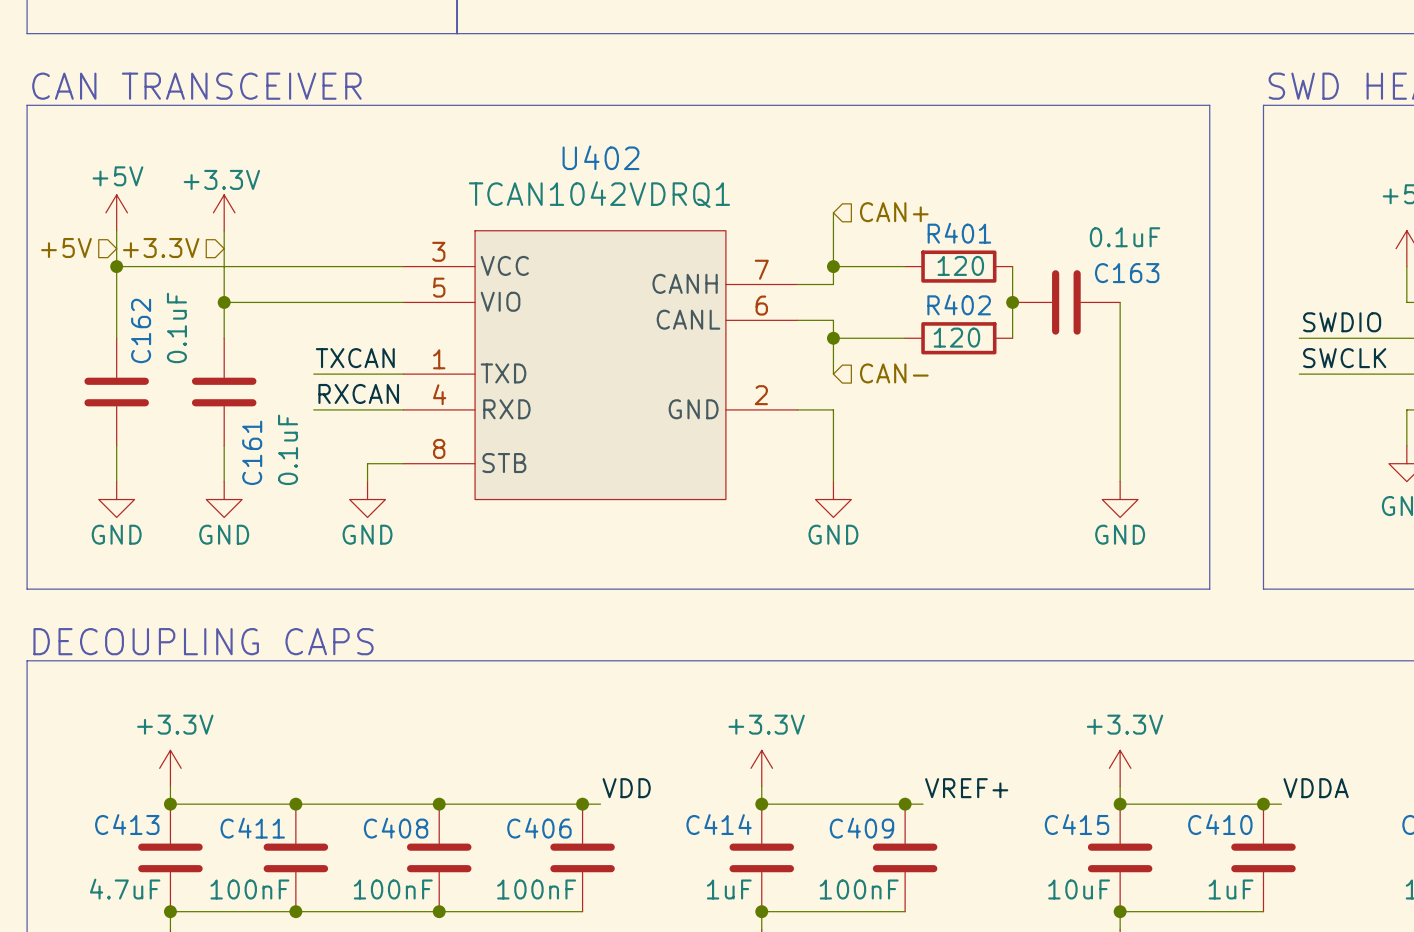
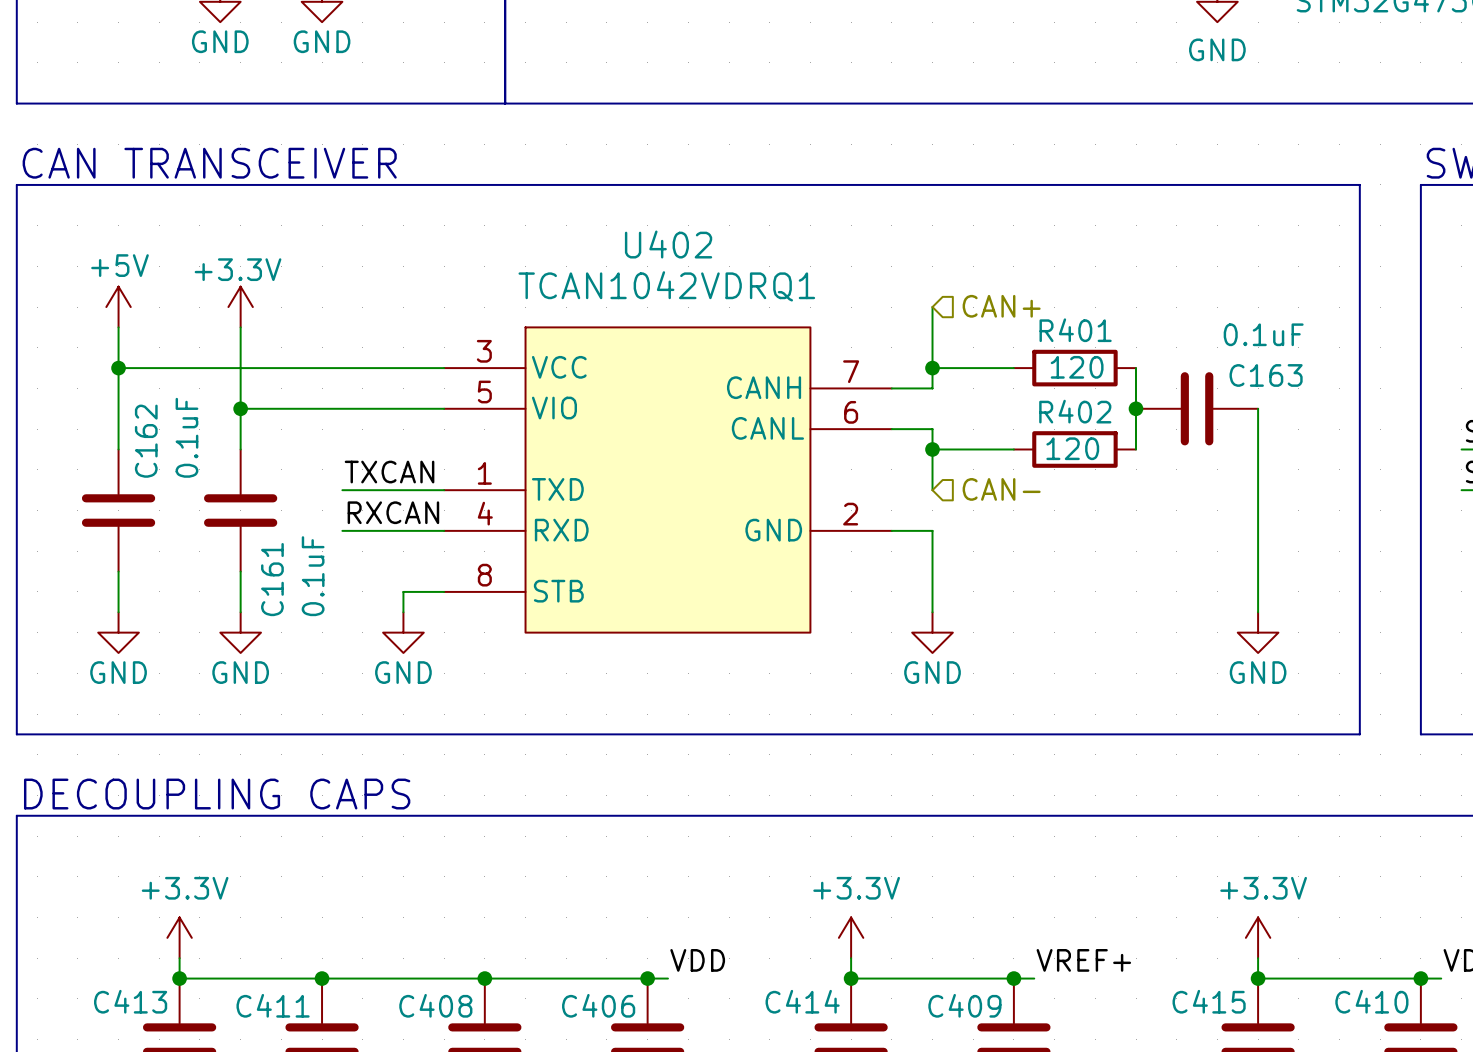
hierarchical label: +5V (66, 248) -> none
hierarchical label: +3.3V (161, 248) -> none

